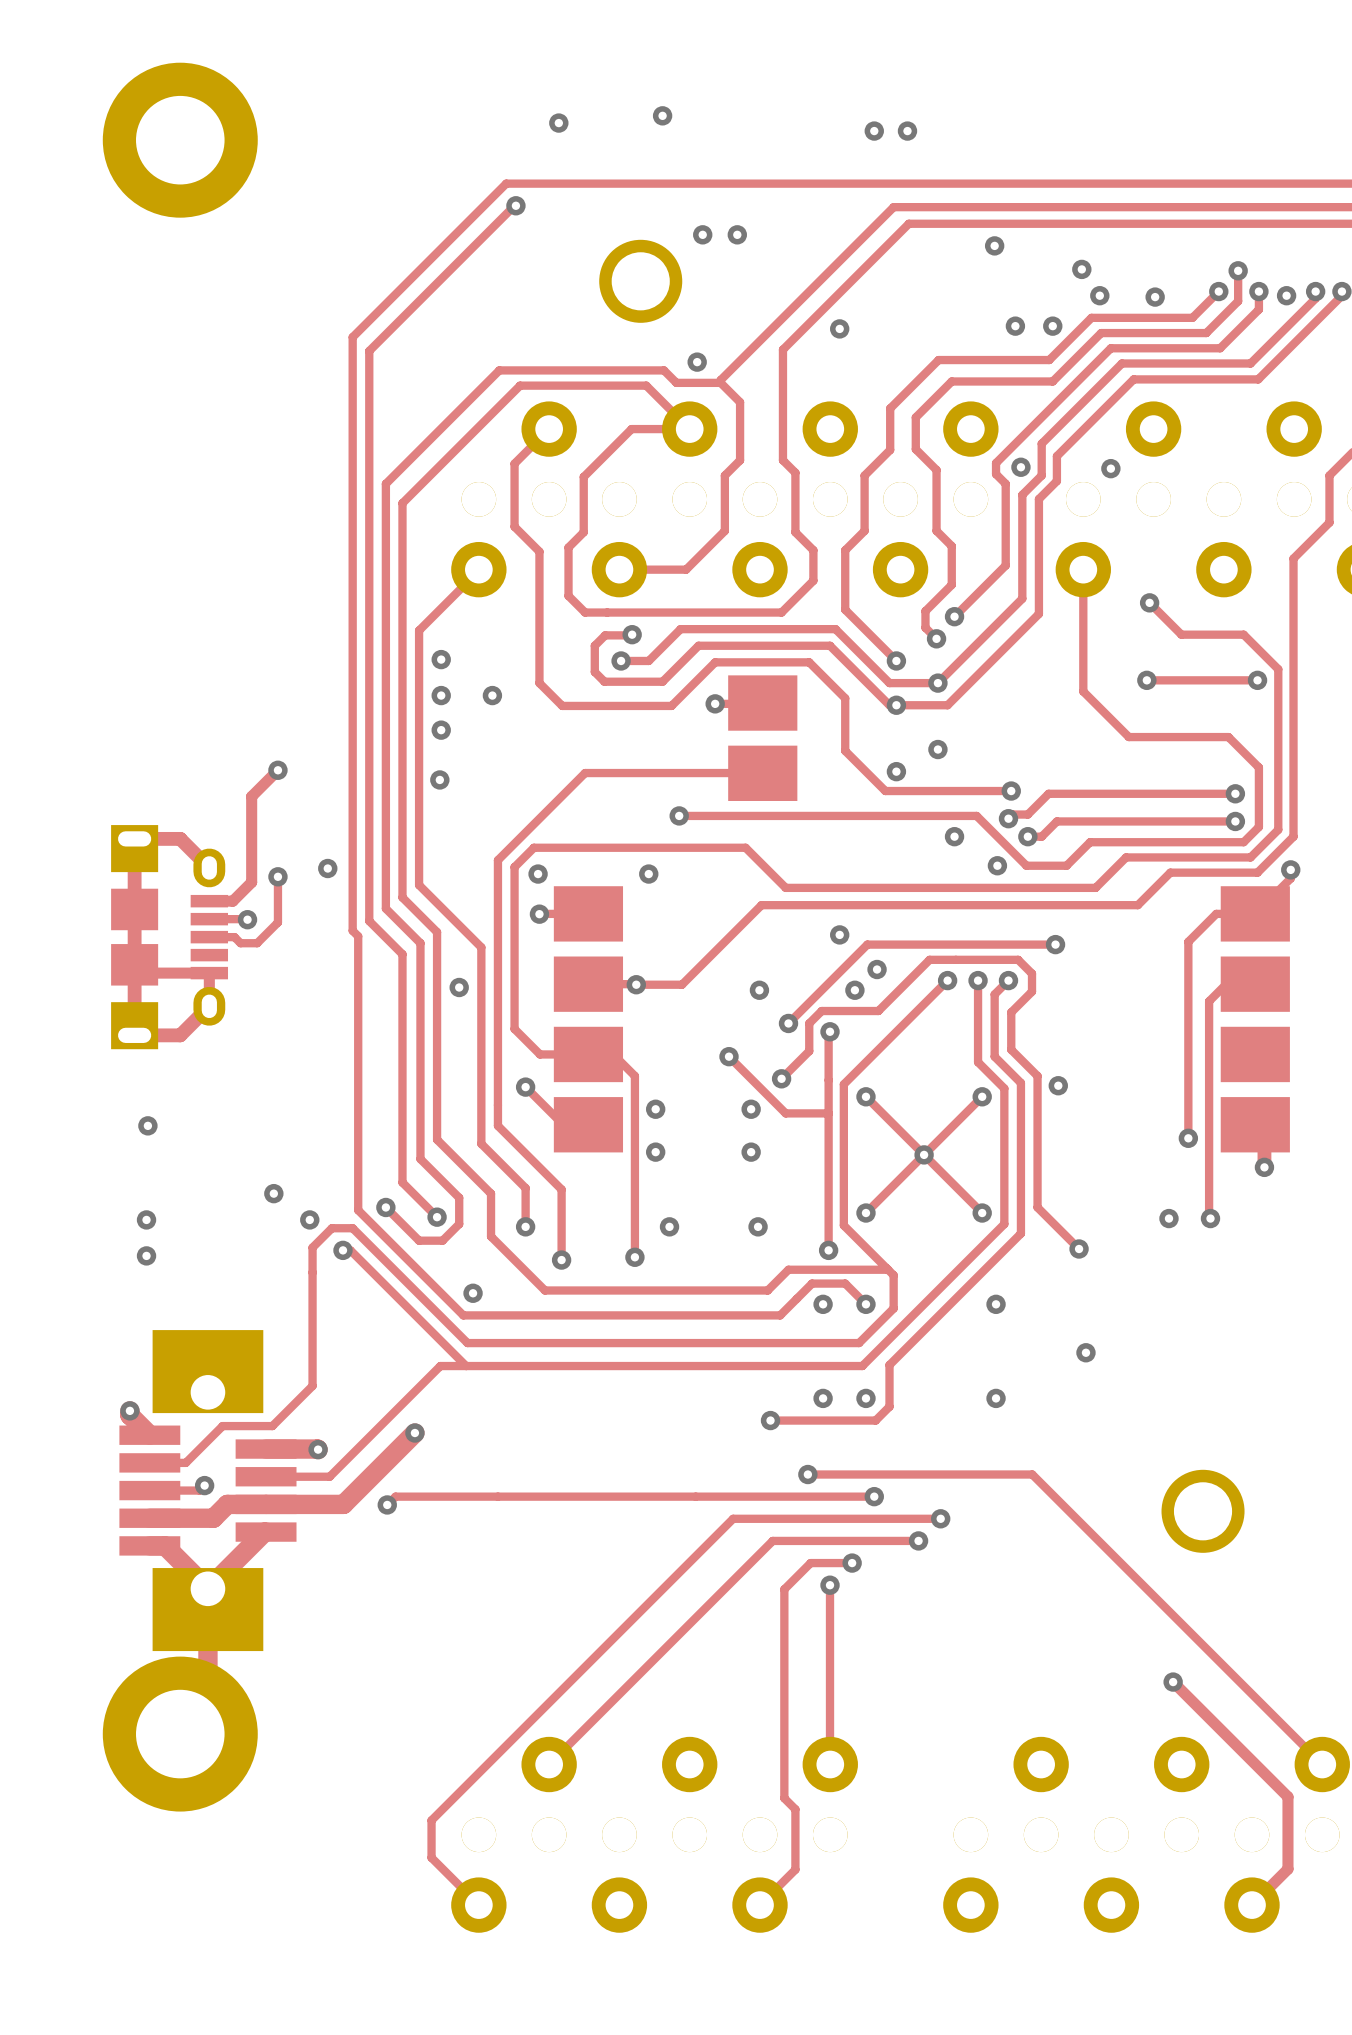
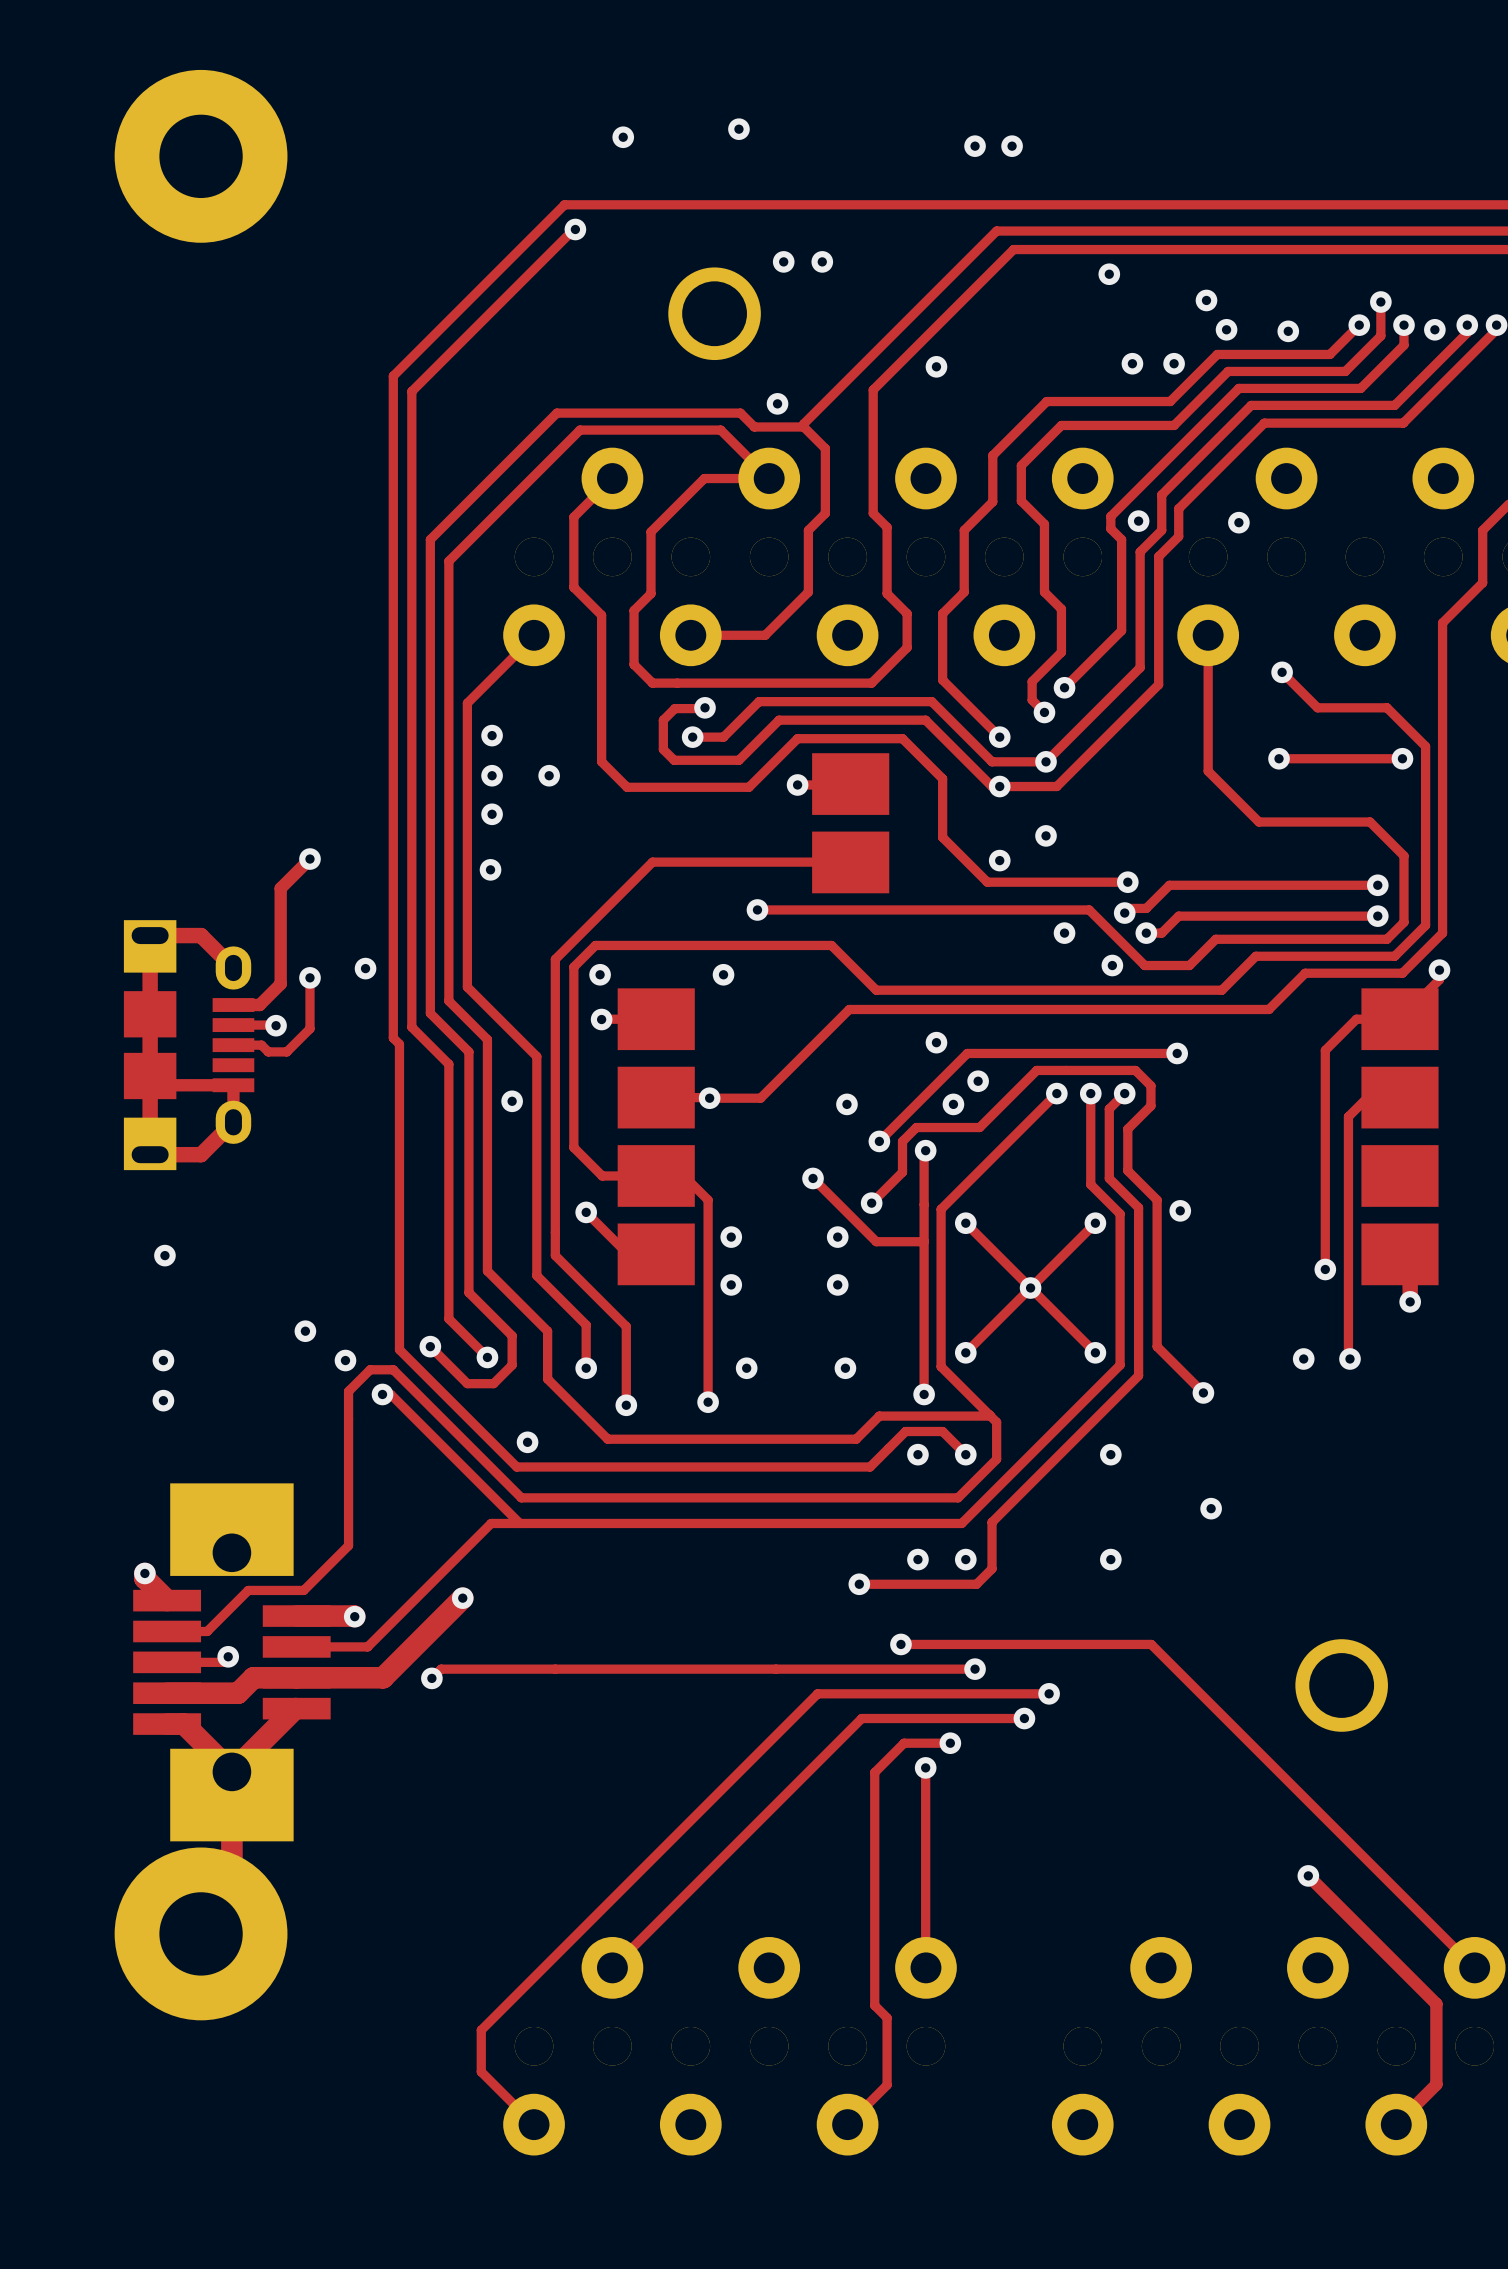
part footprint: [102, 62, 258, 218] -> [114, 69, 288, 243]
part footprint: [102, 1656, 258, 1812] -> [114, 1847, 288, 2021]

